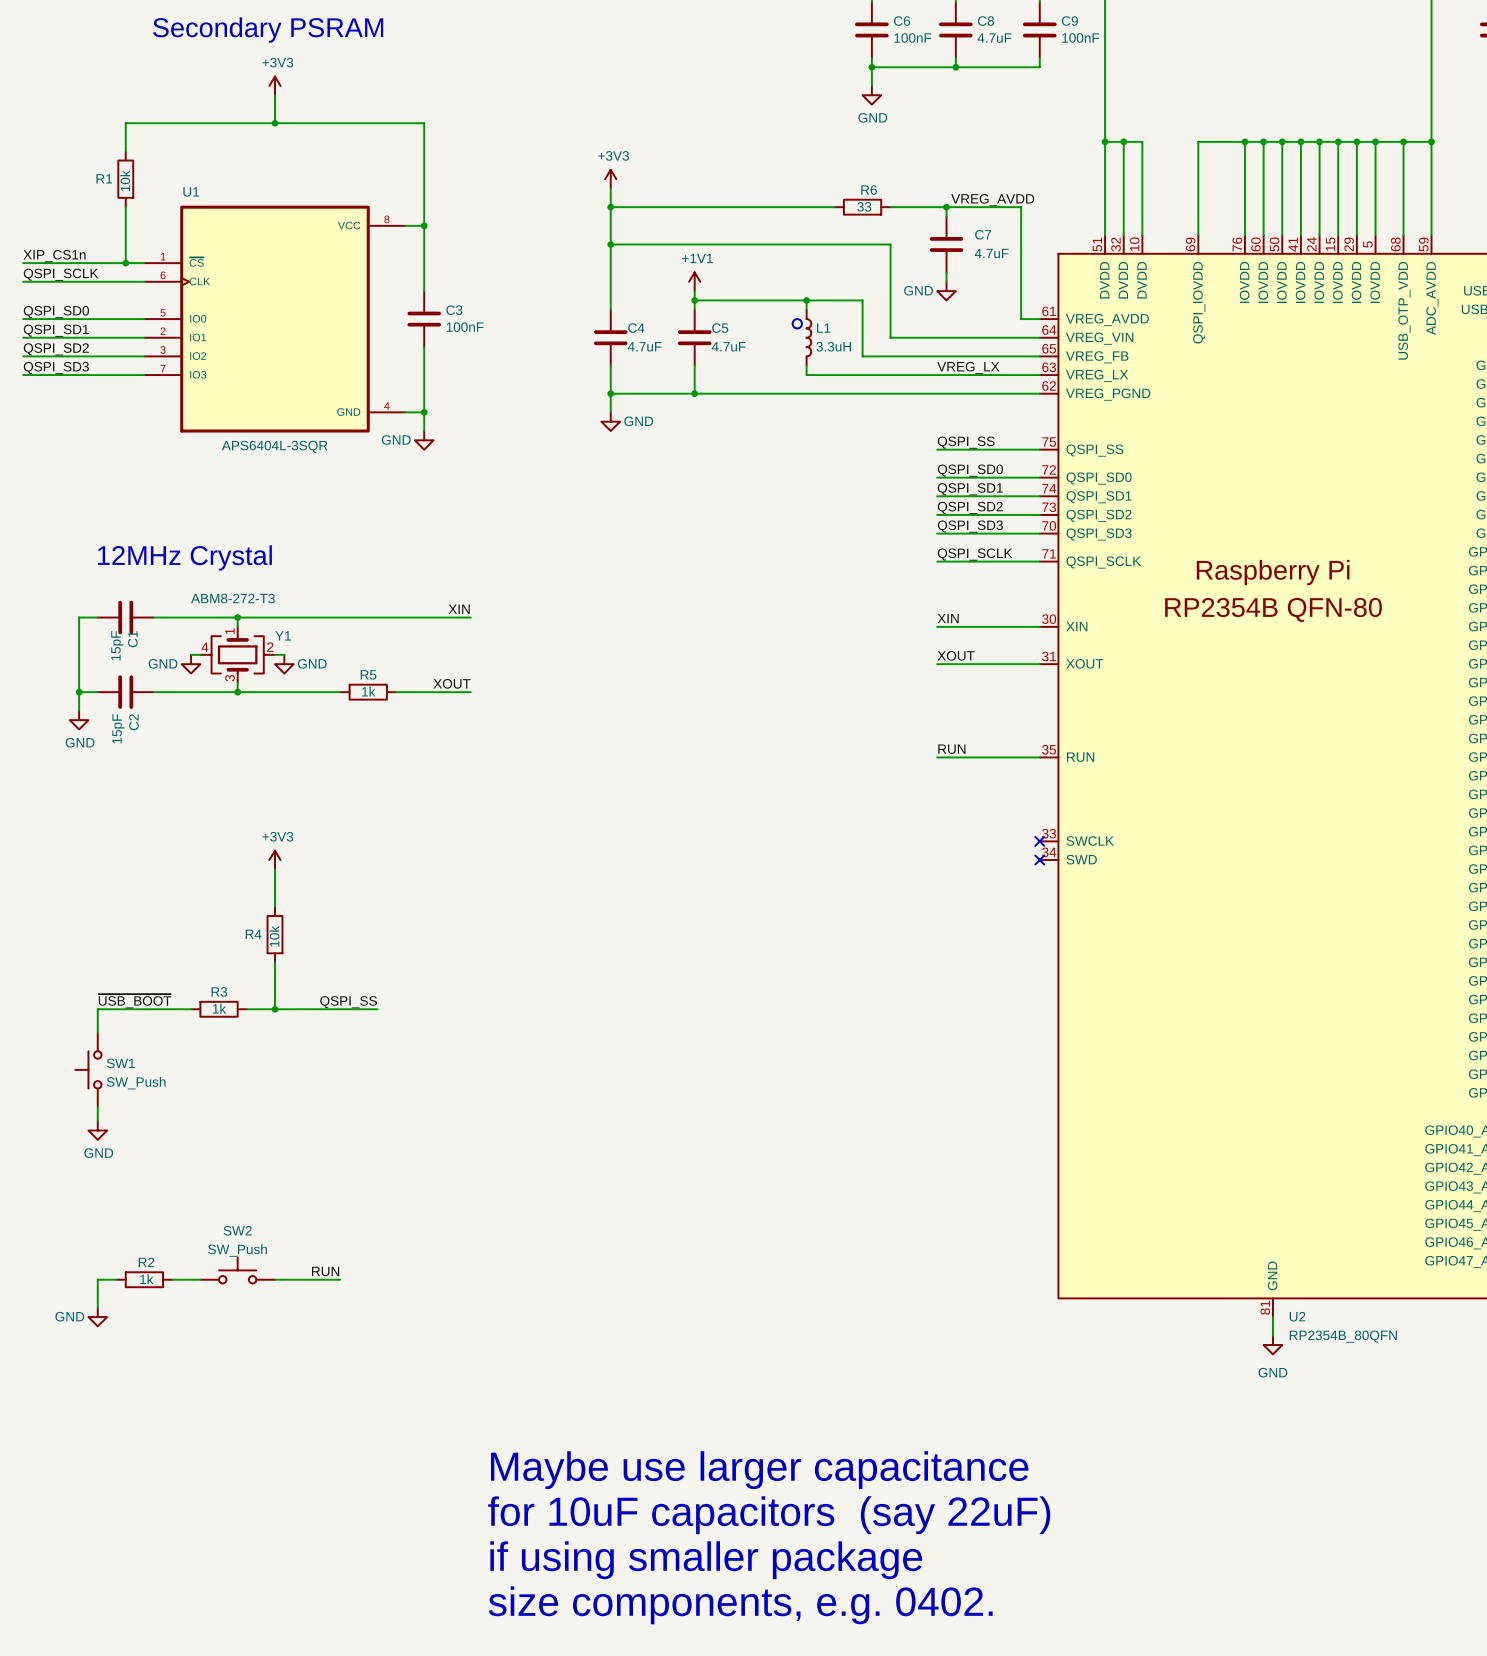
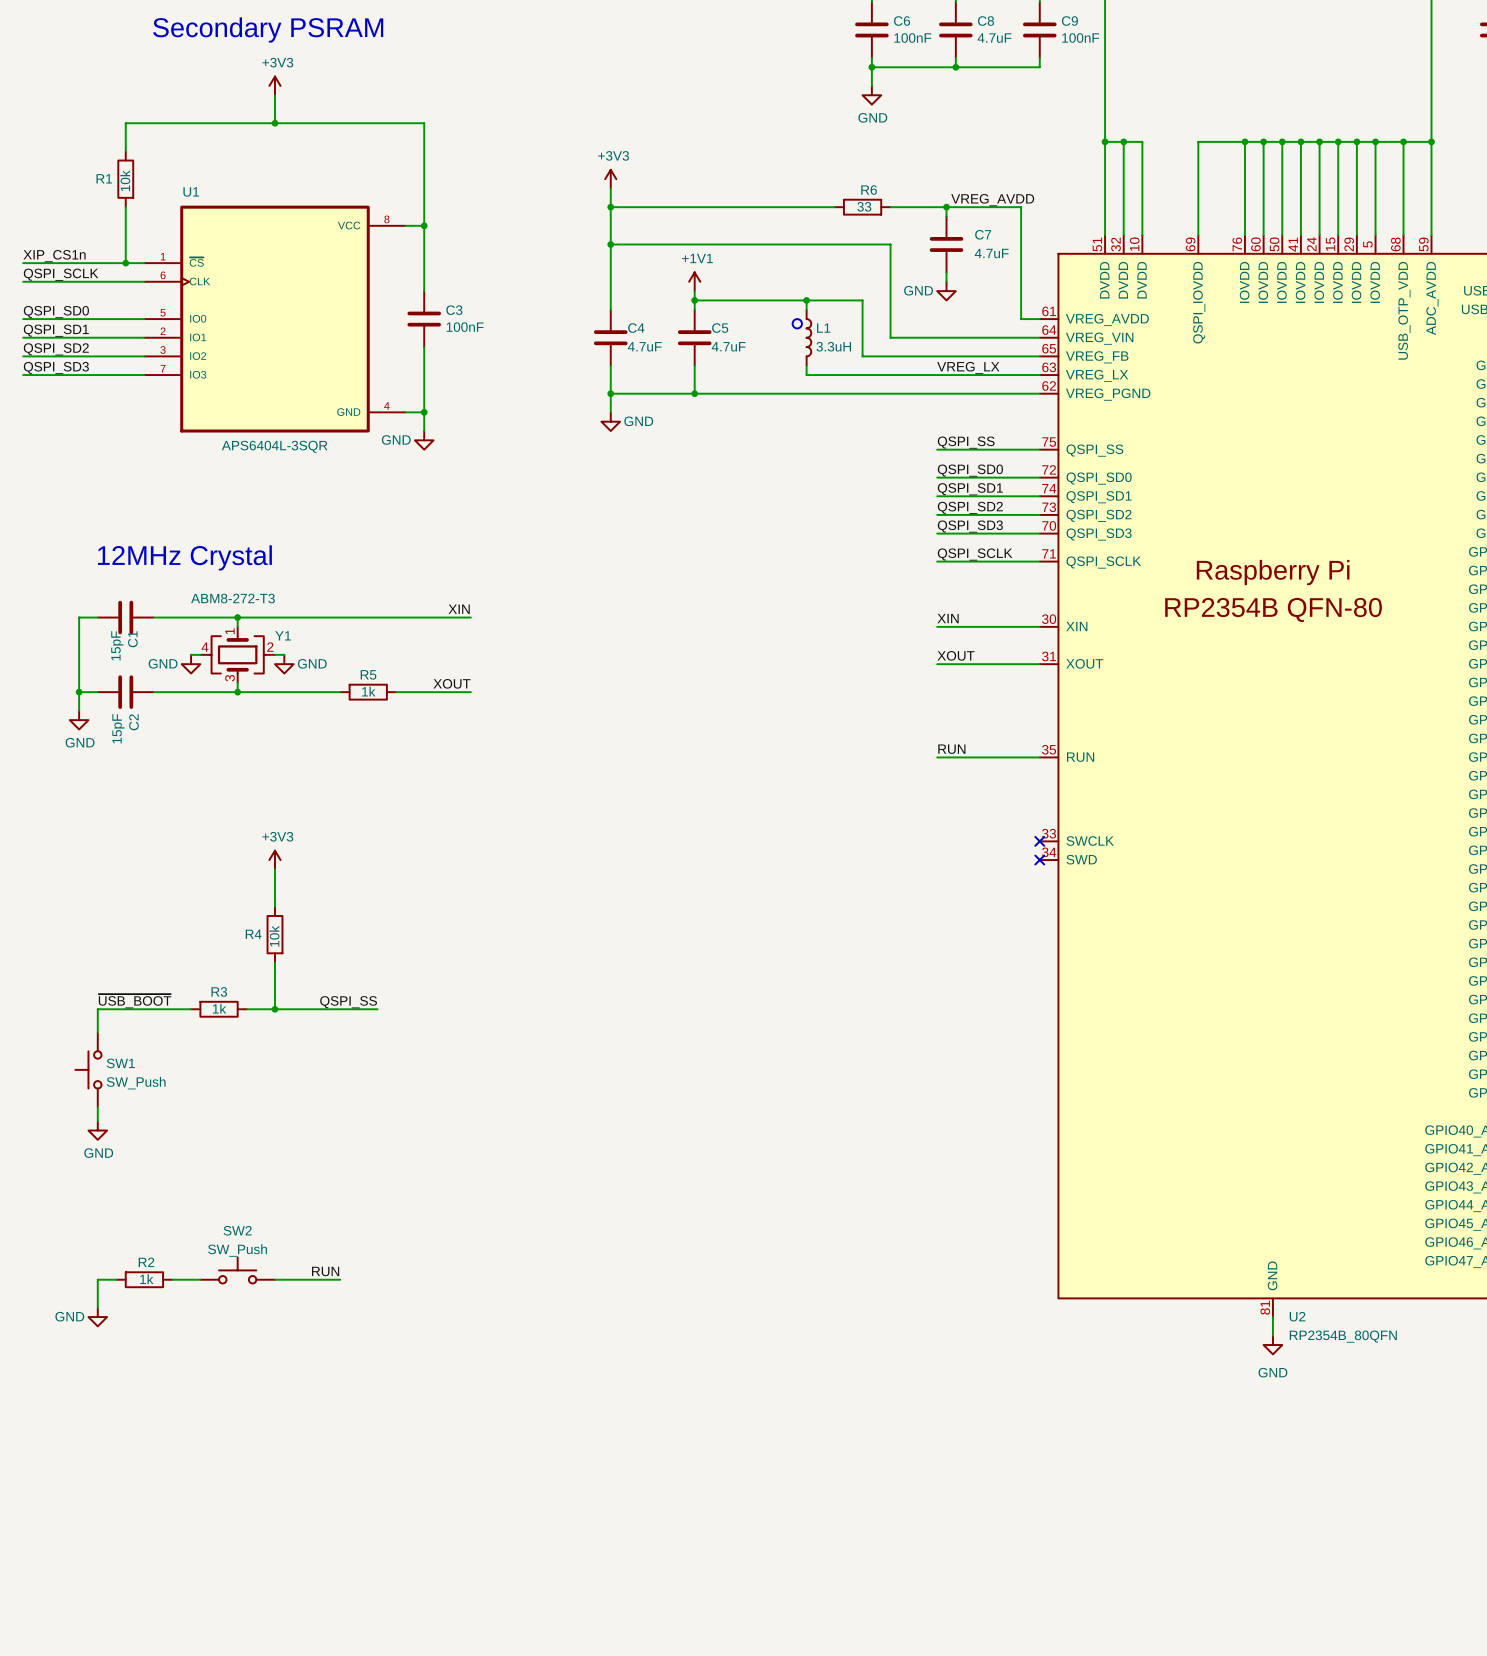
text: Maybe use larger capacitance (759, 1470) -> none
text: for 10uF capacitors (say 22uF) (769, 1515) -> none
text: if using smaller package (706, 1560) -> none
text: size components, e.g. 0402. (740, 1605) -> none

